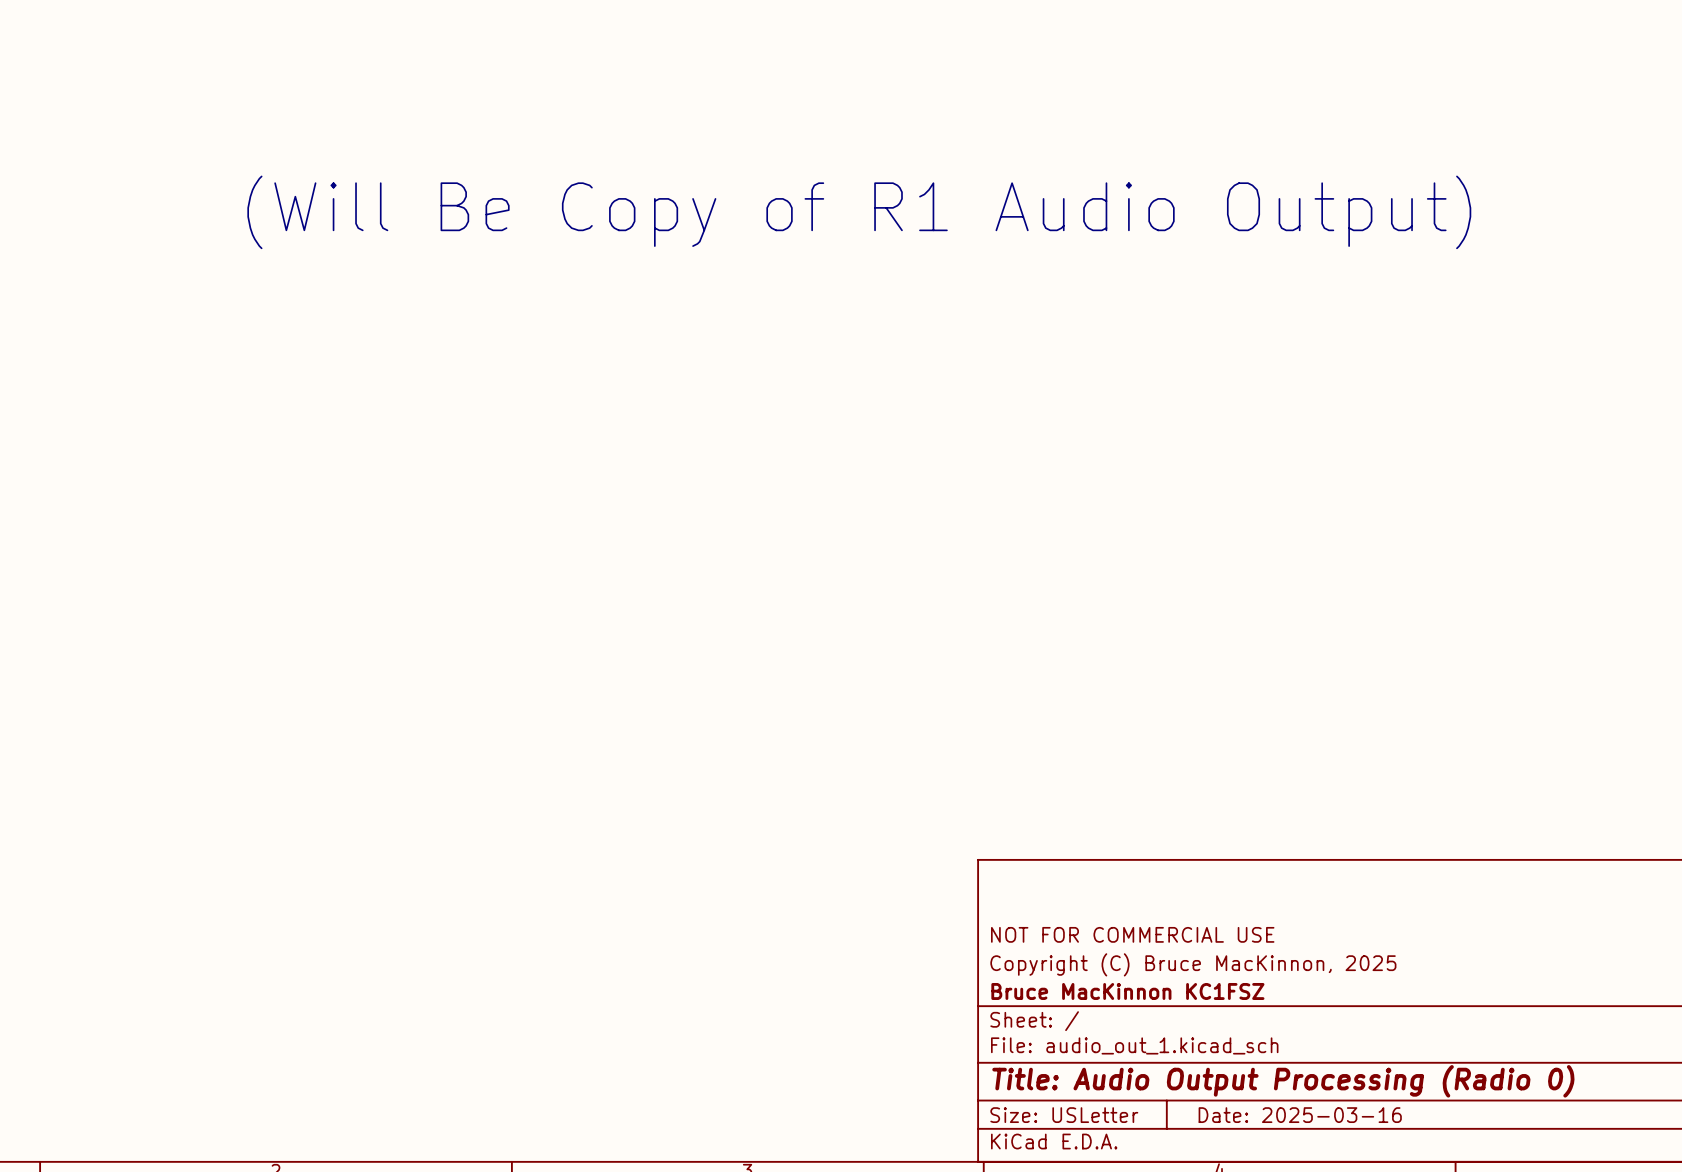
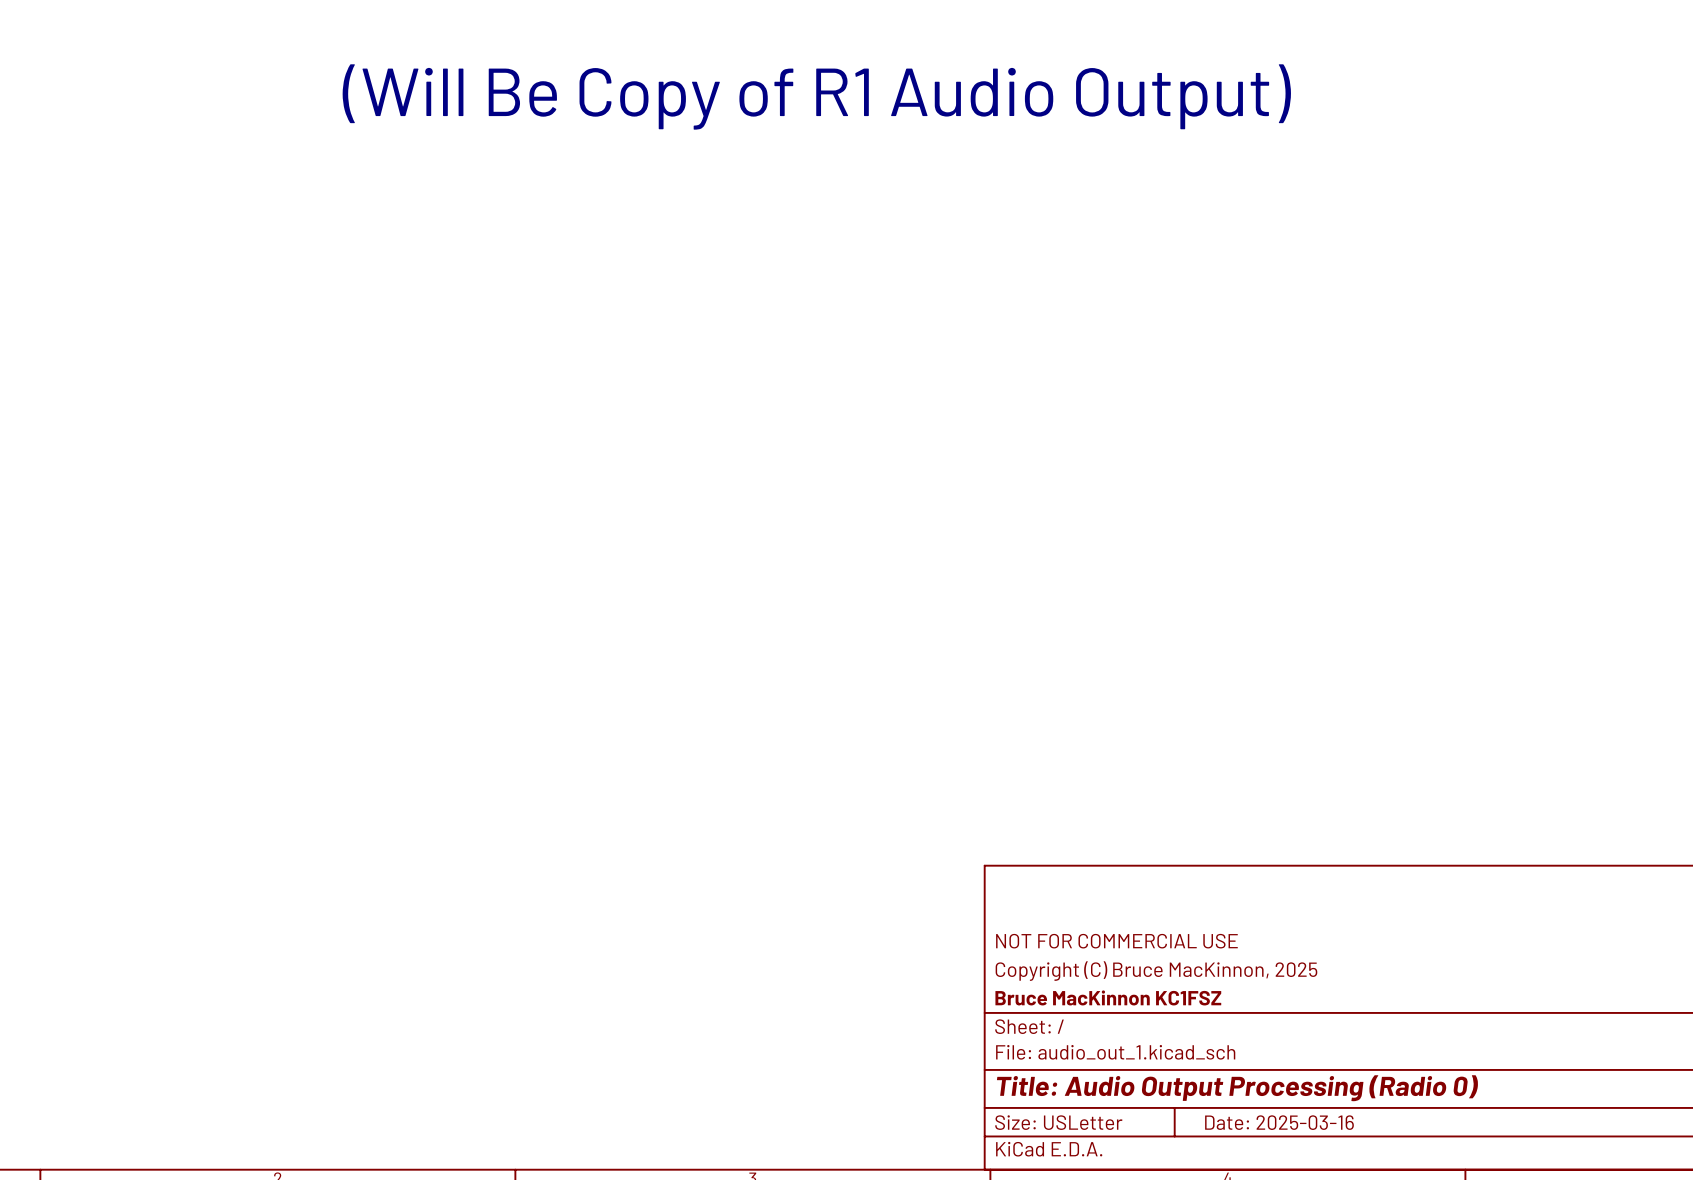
text position: (Will Be Copy of R1 Audio Output) (859, 212) -> (Will Be Copy of R1 Audio Output) (816, 96)

